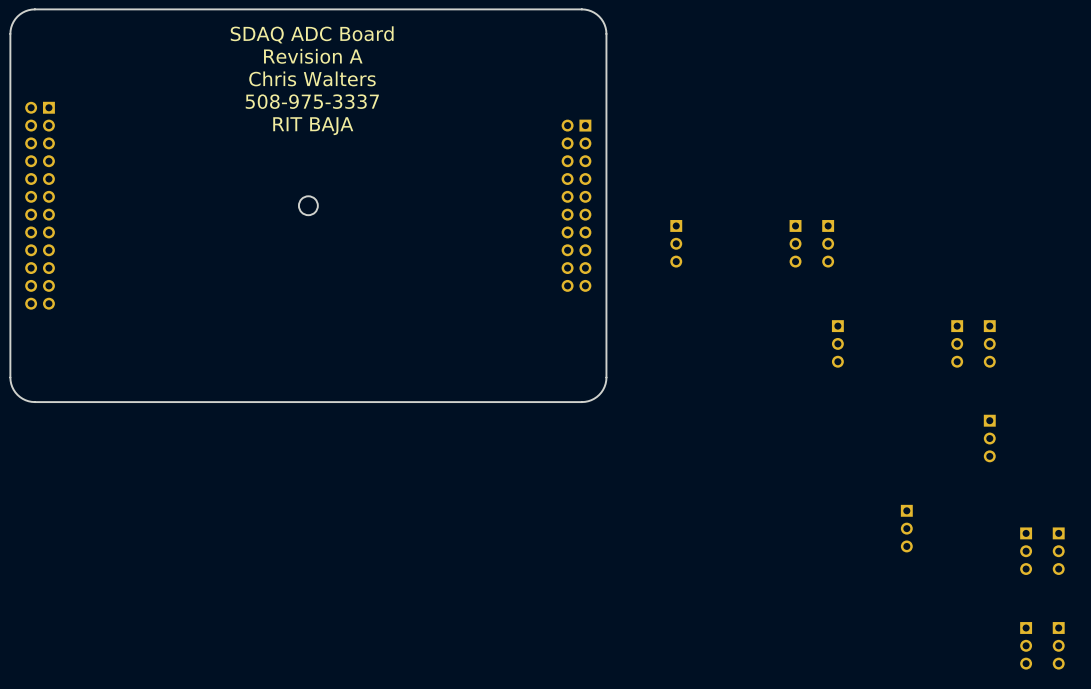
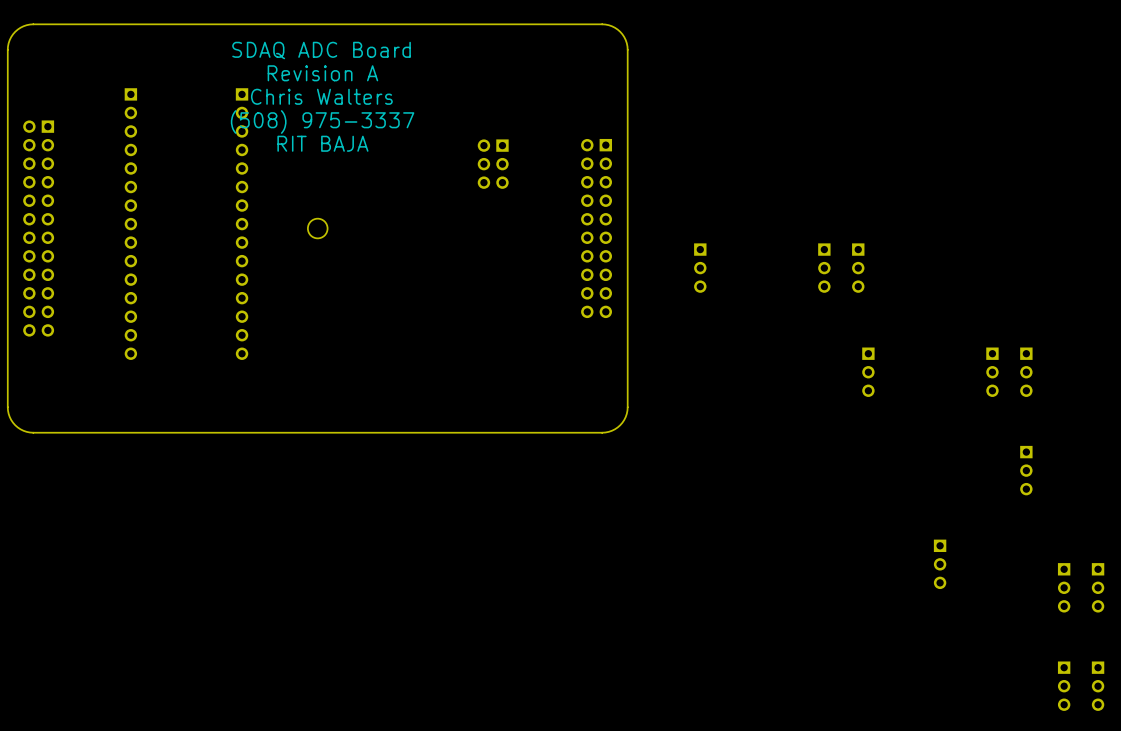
text: 508-975-3337 (312, 101) -> (508) 975-3337 (322, 121)
part: none -> (493, 164)
part: none -> (130, 224)
part: none -> (242, 224)

